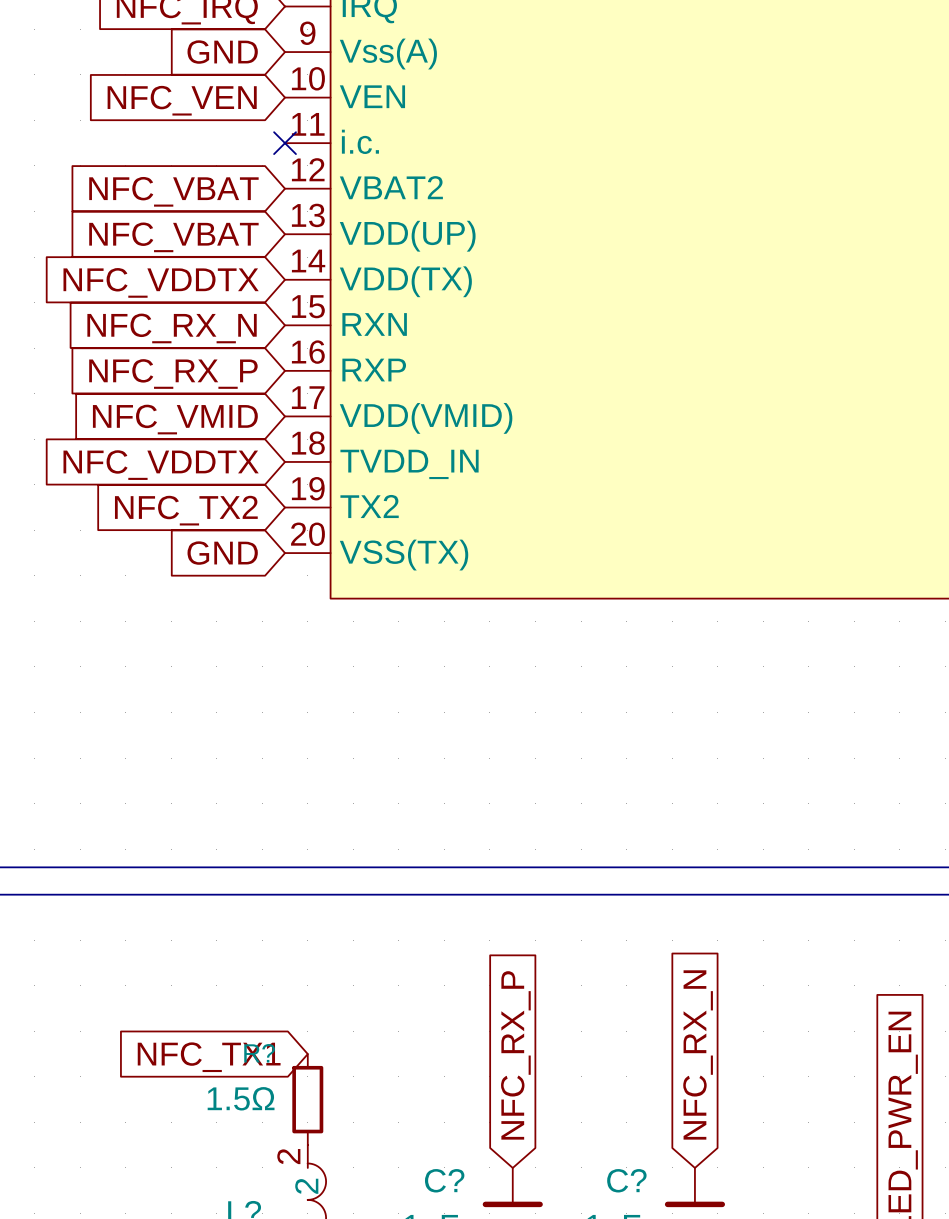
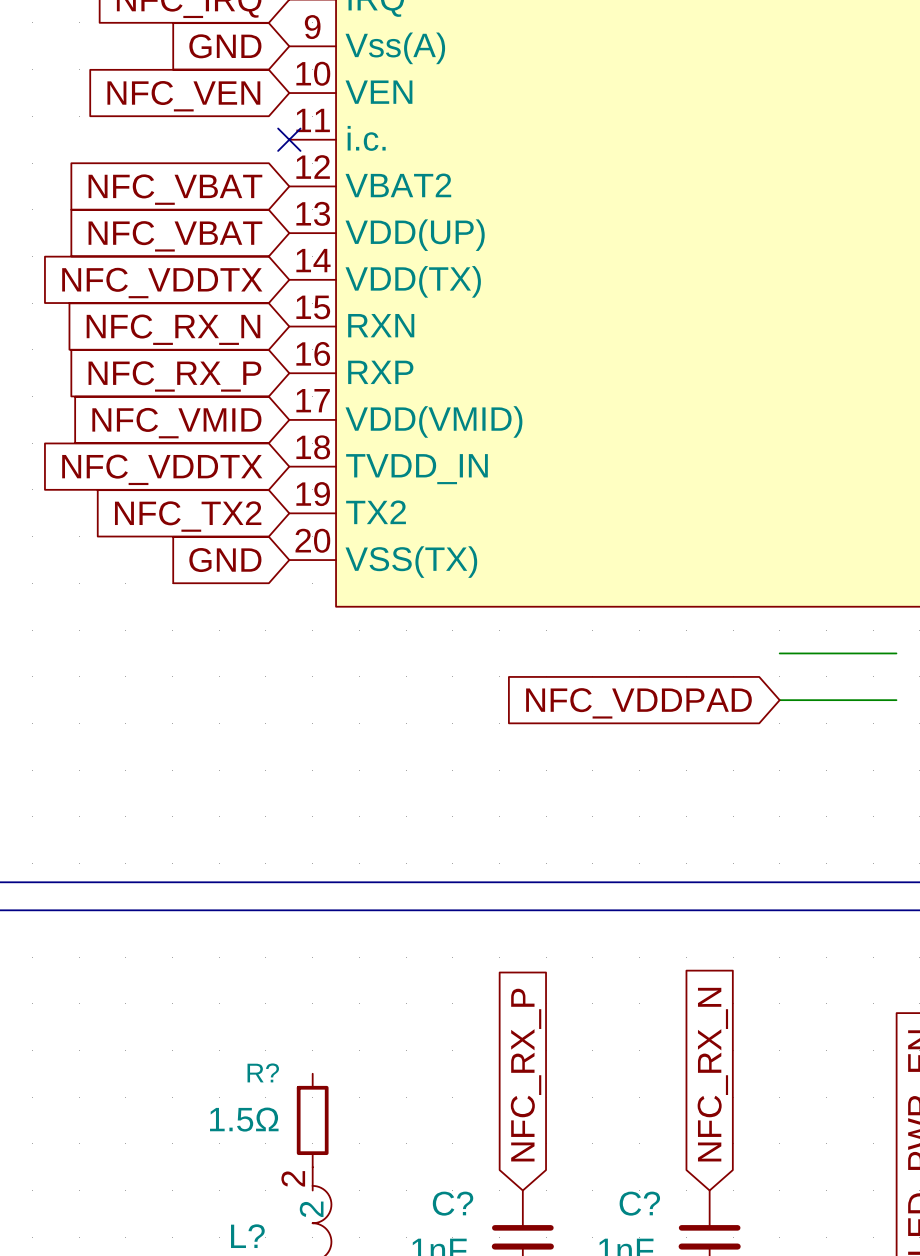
wire: none -> (779, 653) (896, 653)
wire: none -> (779, 700) (896, 700)
global label: none -> NFC_VDDPAD (638, 703)
global label: NFC_TX1 (209, 1057) -> none

